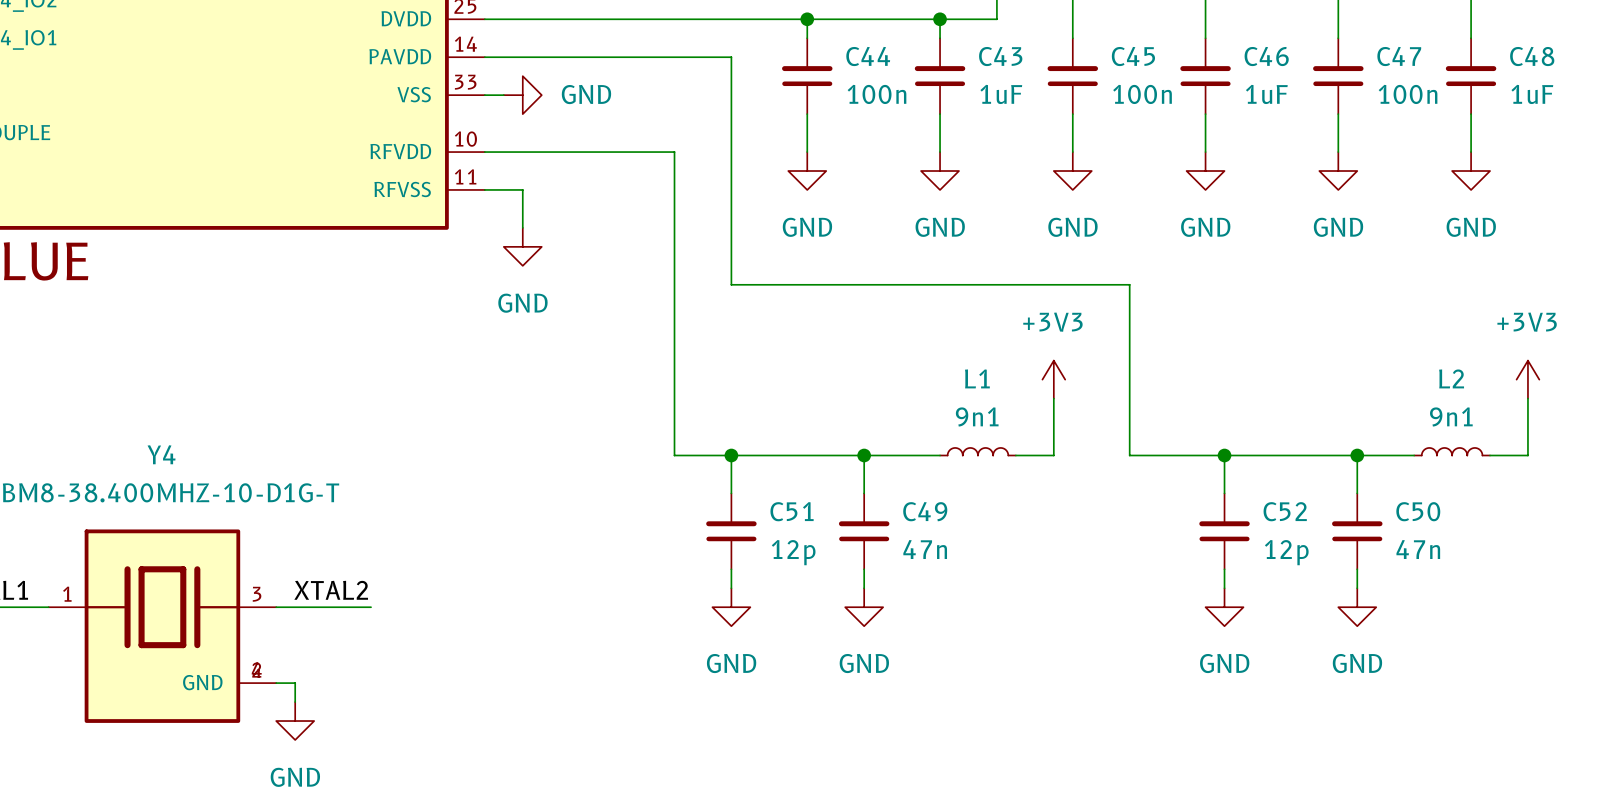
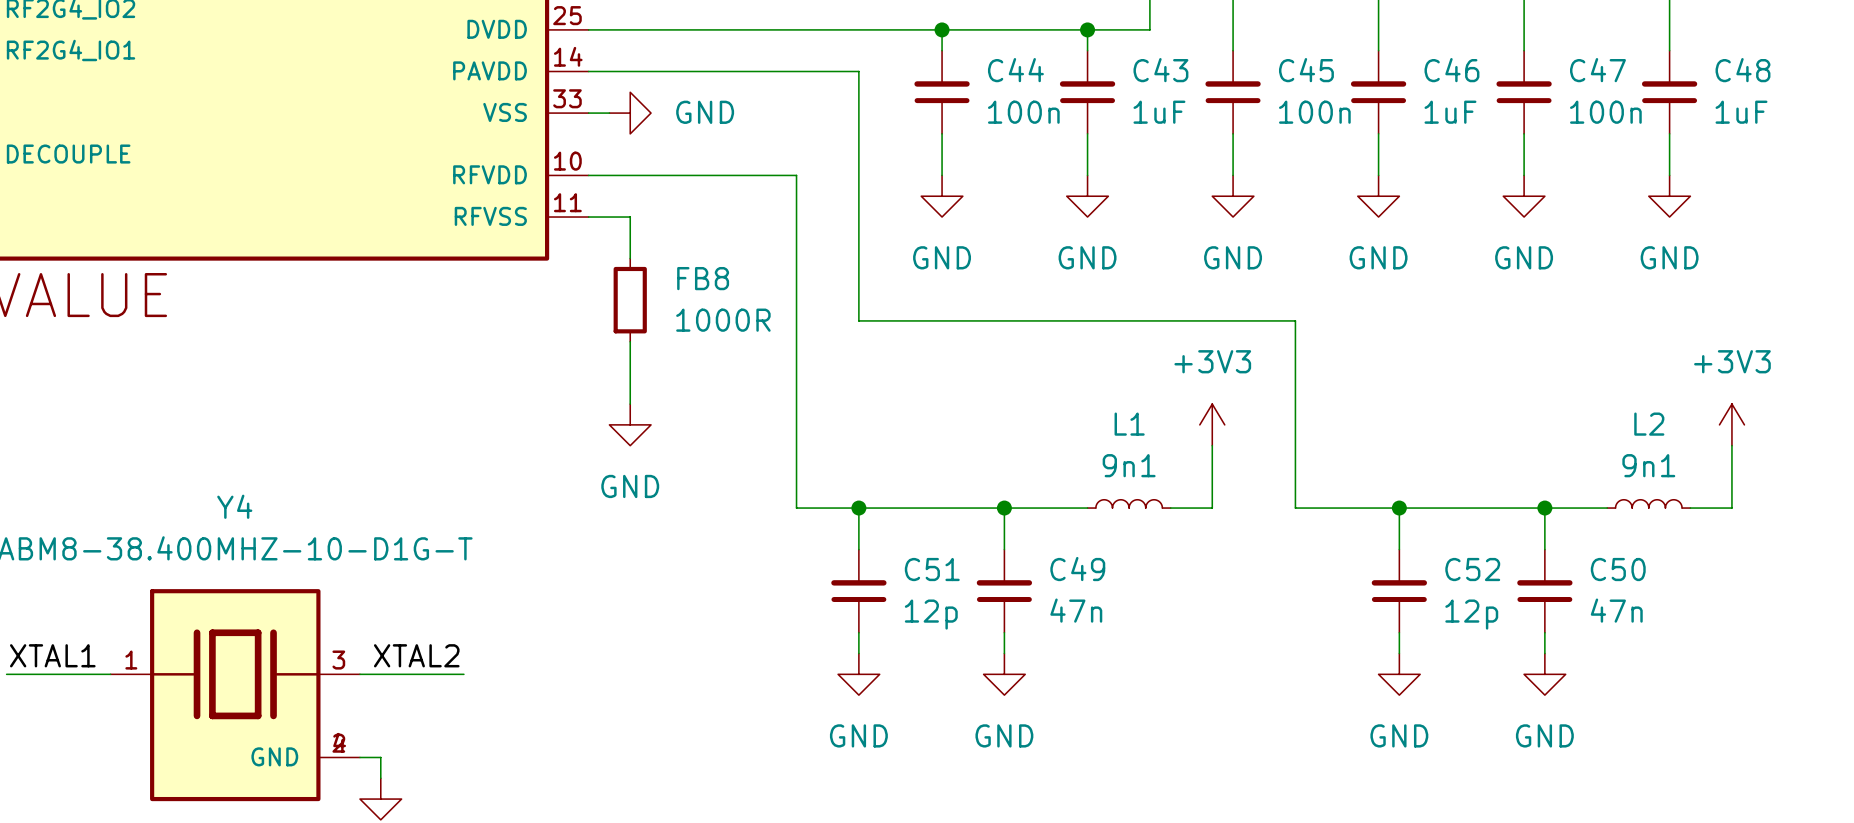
power symbol position: GND (522, 246) -> GND (630, 424)
FB8: none -> (630, 300)
wire: none -> (630, 341) (630, 404)

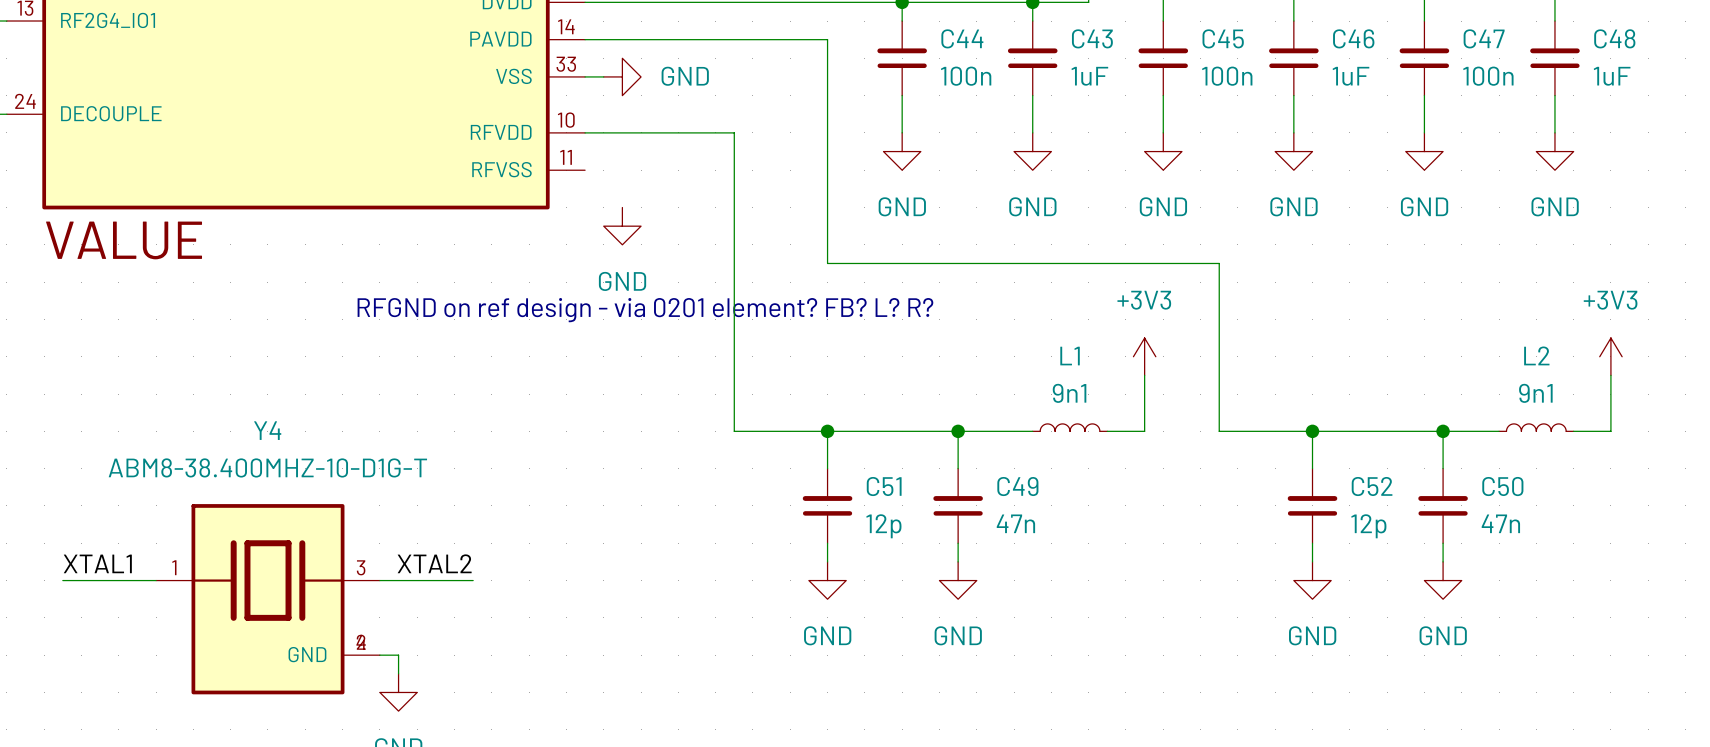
wire: (754, 175) (796, 175) (796, 508) -> (734, 132) (734, 431) (771, 431)
wire: (588, 217) (630, 217) (630, 258) -> none
FB8: (630, 300) -> none
wire: (630, 341) (630, 404) -> none
text: none -> RFGND on ref design - via 0201 element? FB? L? R? (645, 310)
power symbol position: GND (630, 424) -> GND (622, 226)

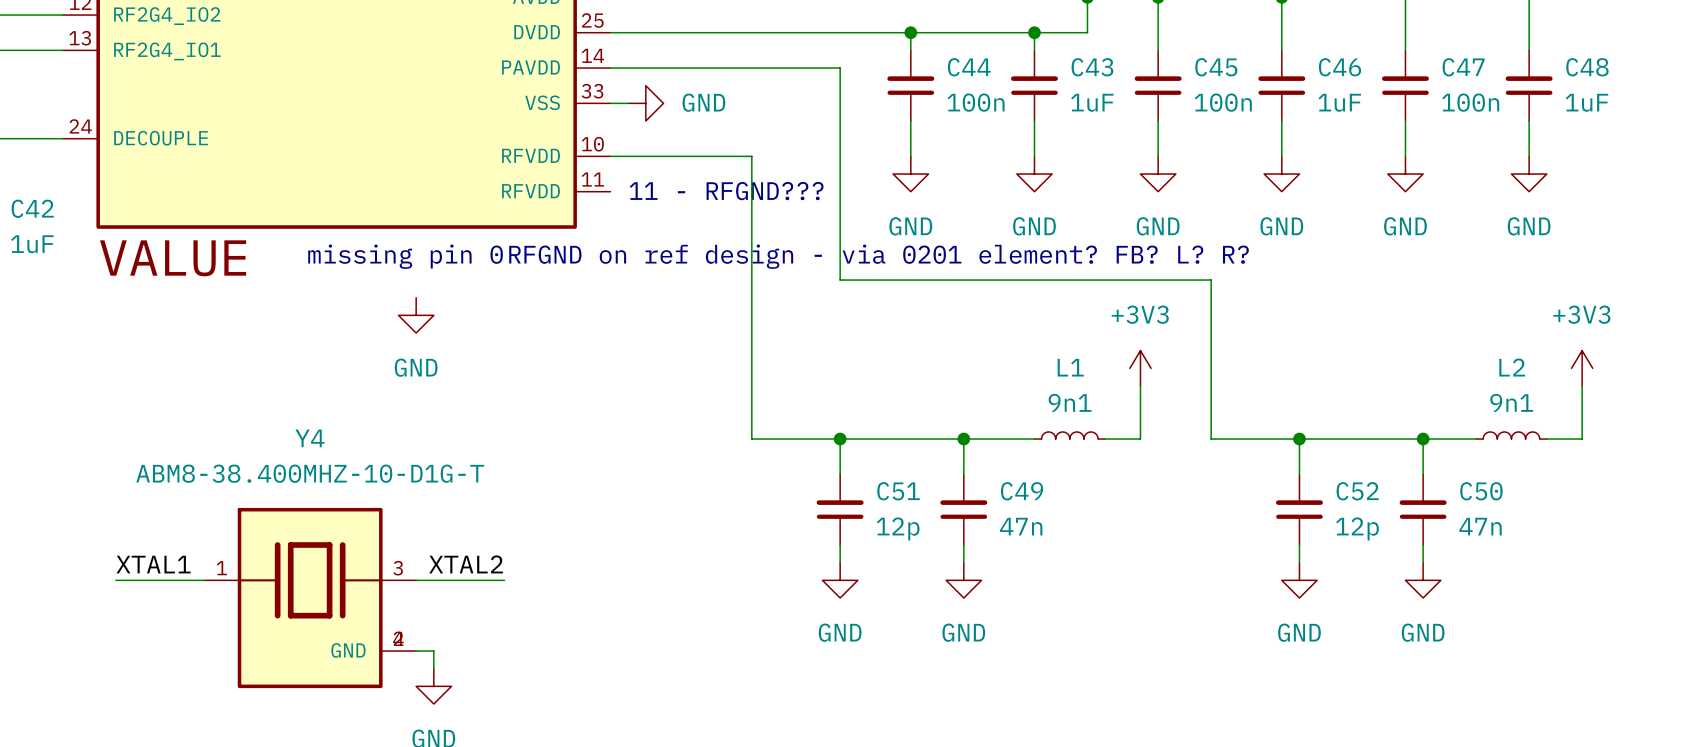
part pin name: RFVSS (501, 169) -> RFVDD (530, 191)
text: none -> 11 - RFGND??? (726, 191)
power symbol position: GND (622, 226) -> GND (416, 315)
text: none -> missing pin 0 (405, 256)
text position: RFGND on ref design - via 0201 element? FB? L? R? (645, 310) -> RFGND on ref design - via 0201 element? FB? L? R? (879, 256)

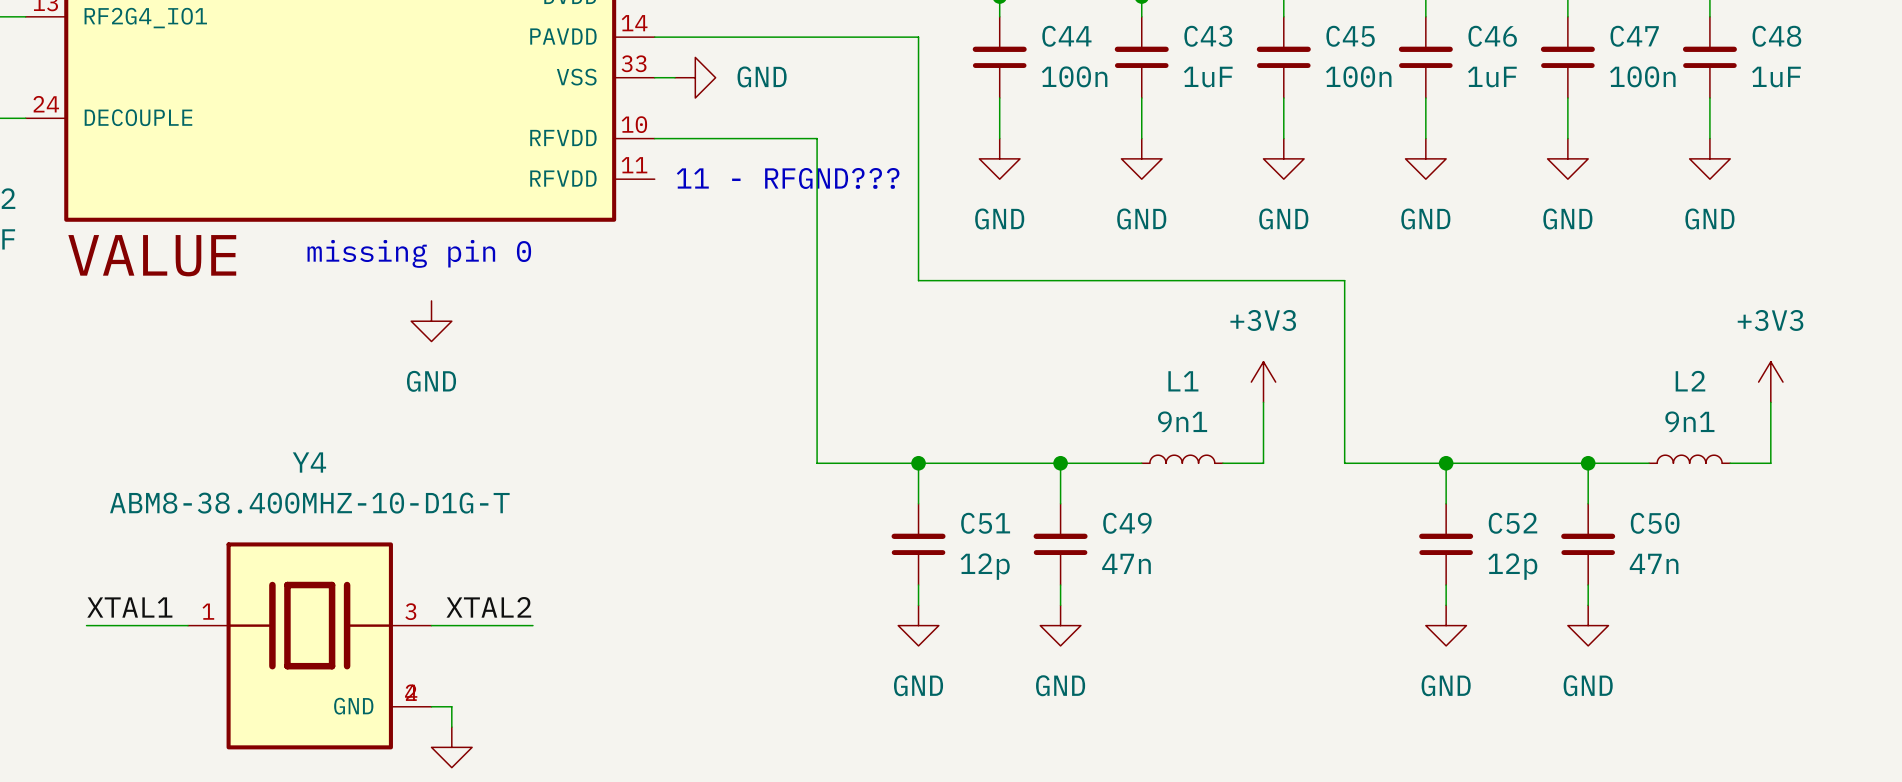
text: RFGND on ref design - via 0201 element? FB? L? R? (879, 256) -> none

